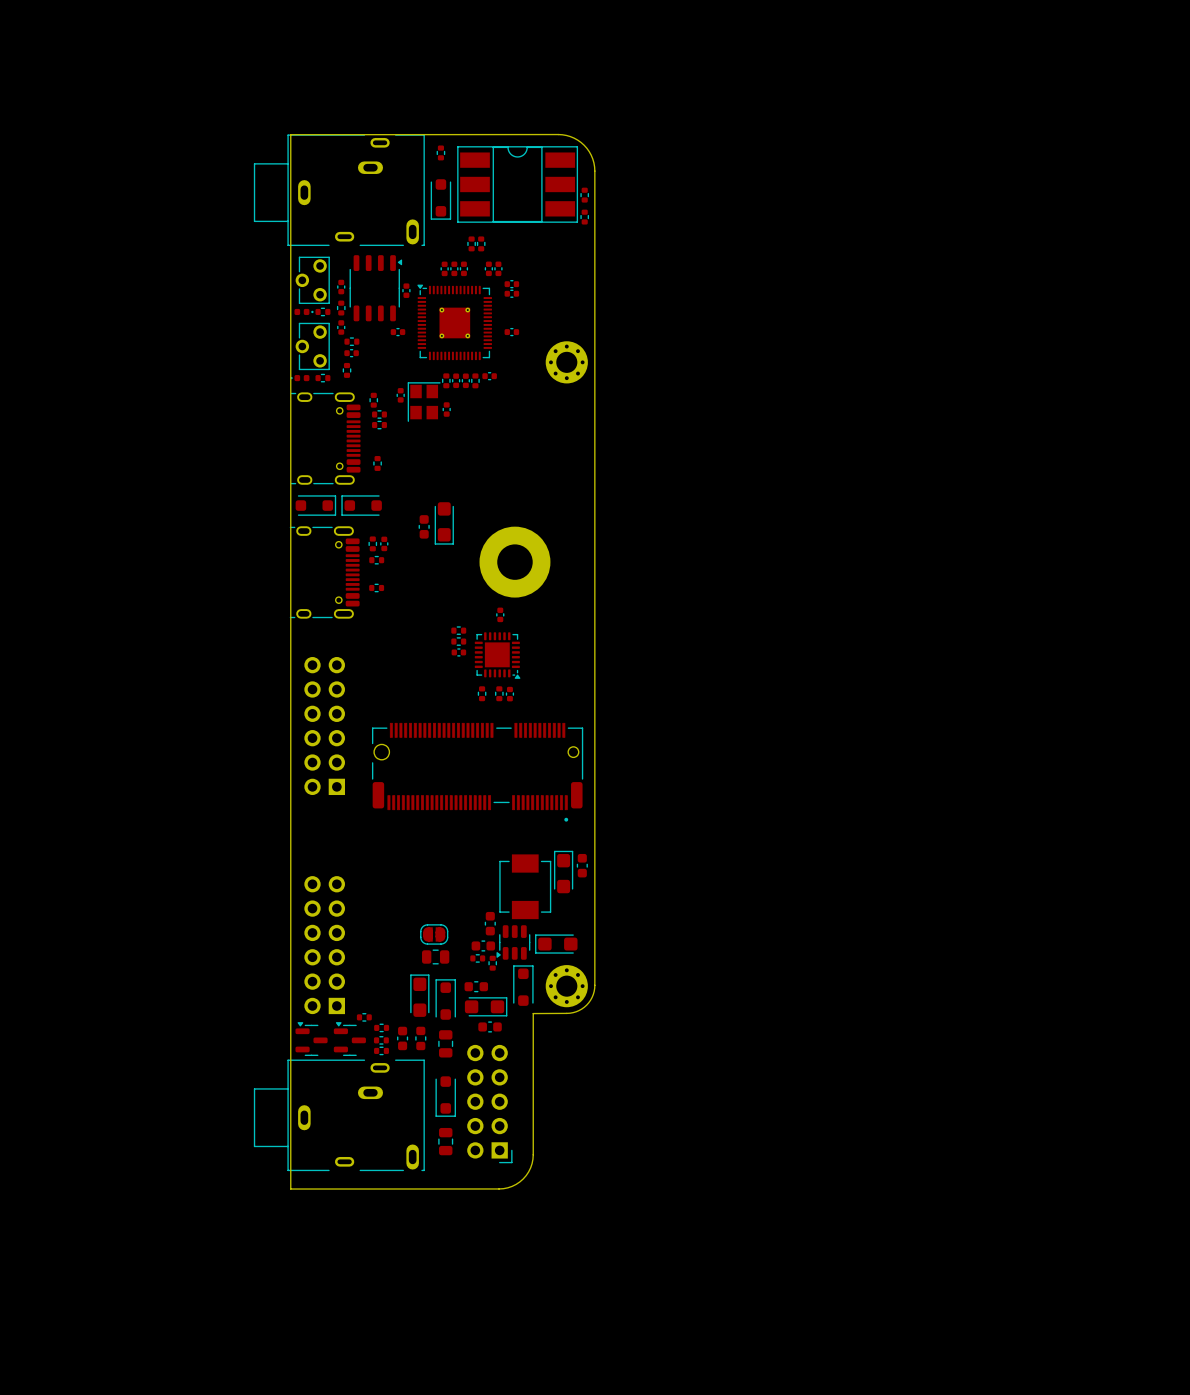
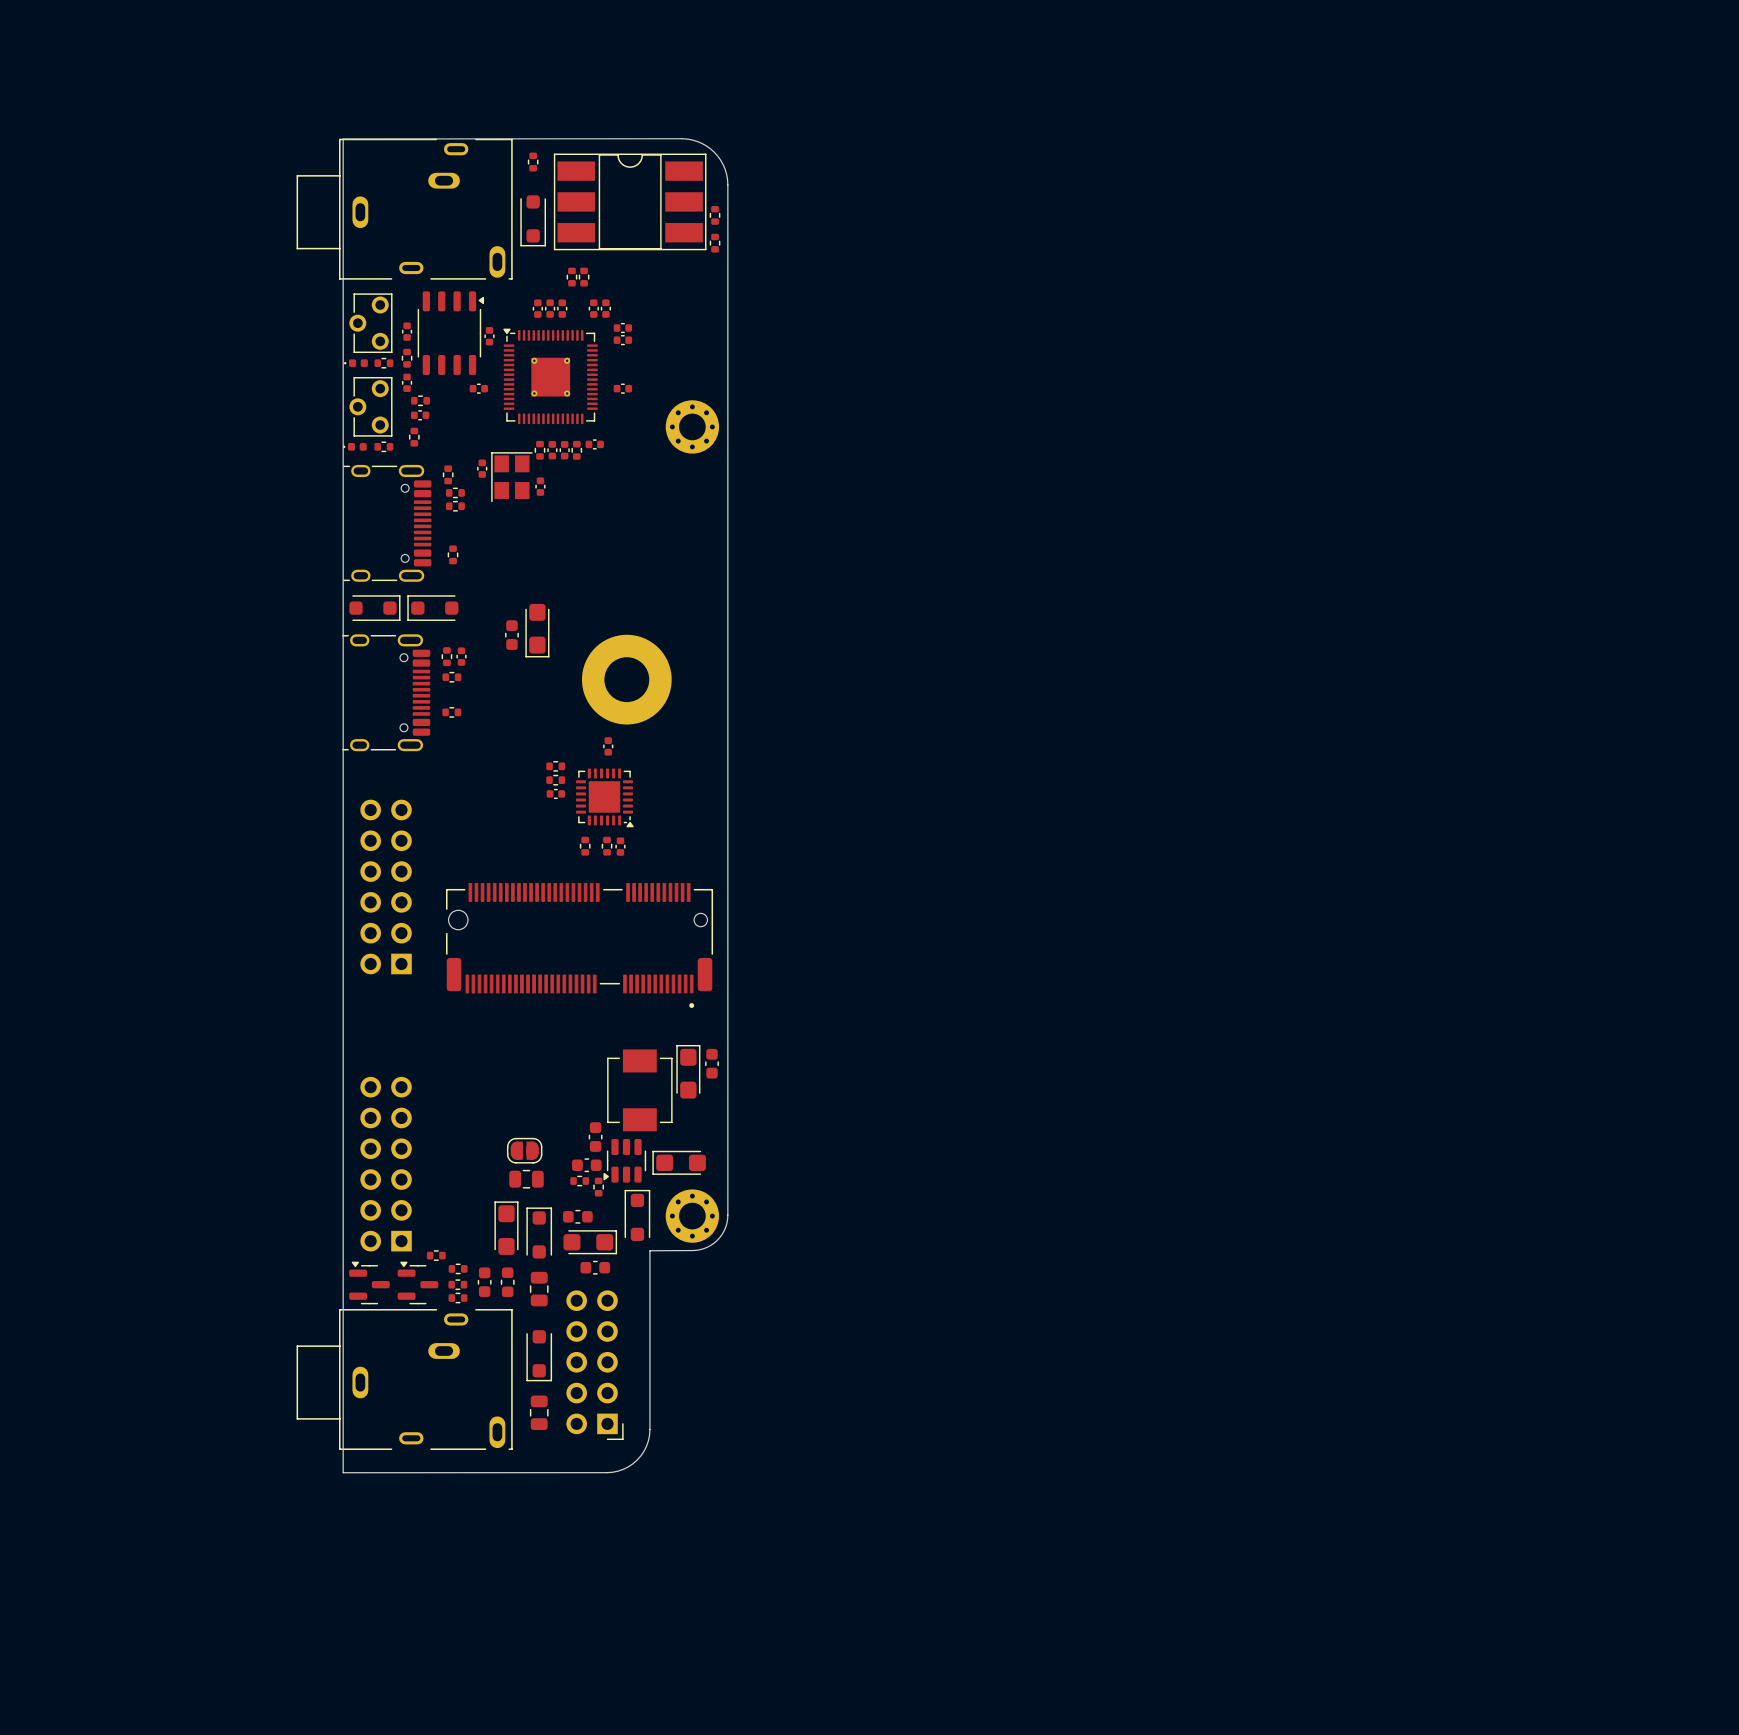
part rotation: 0° (303, 311) -> 180° (355, 363)

